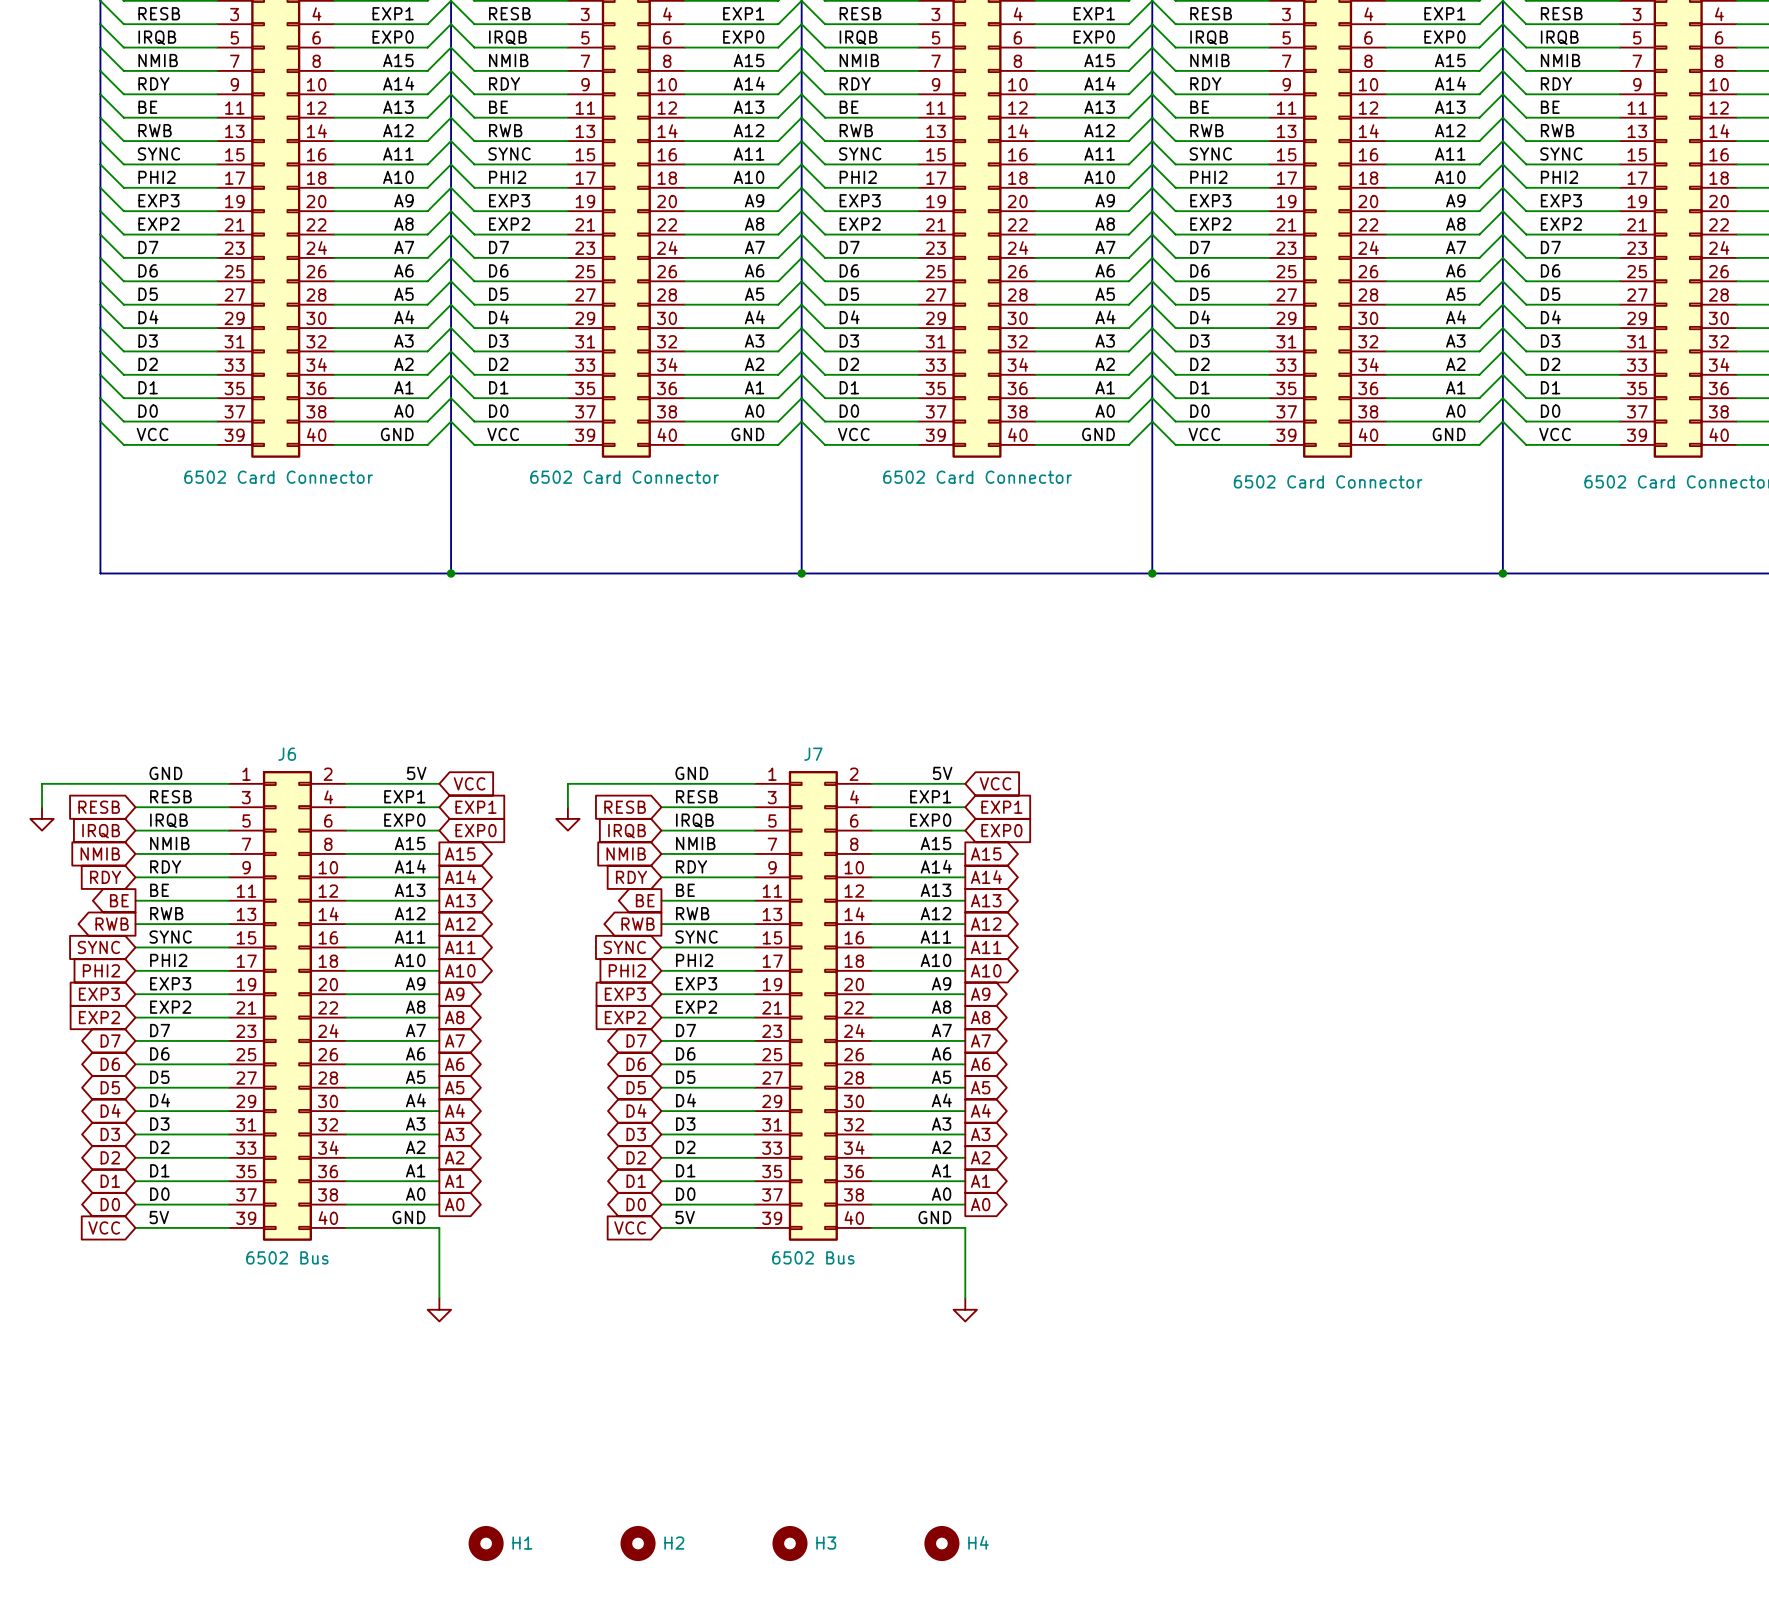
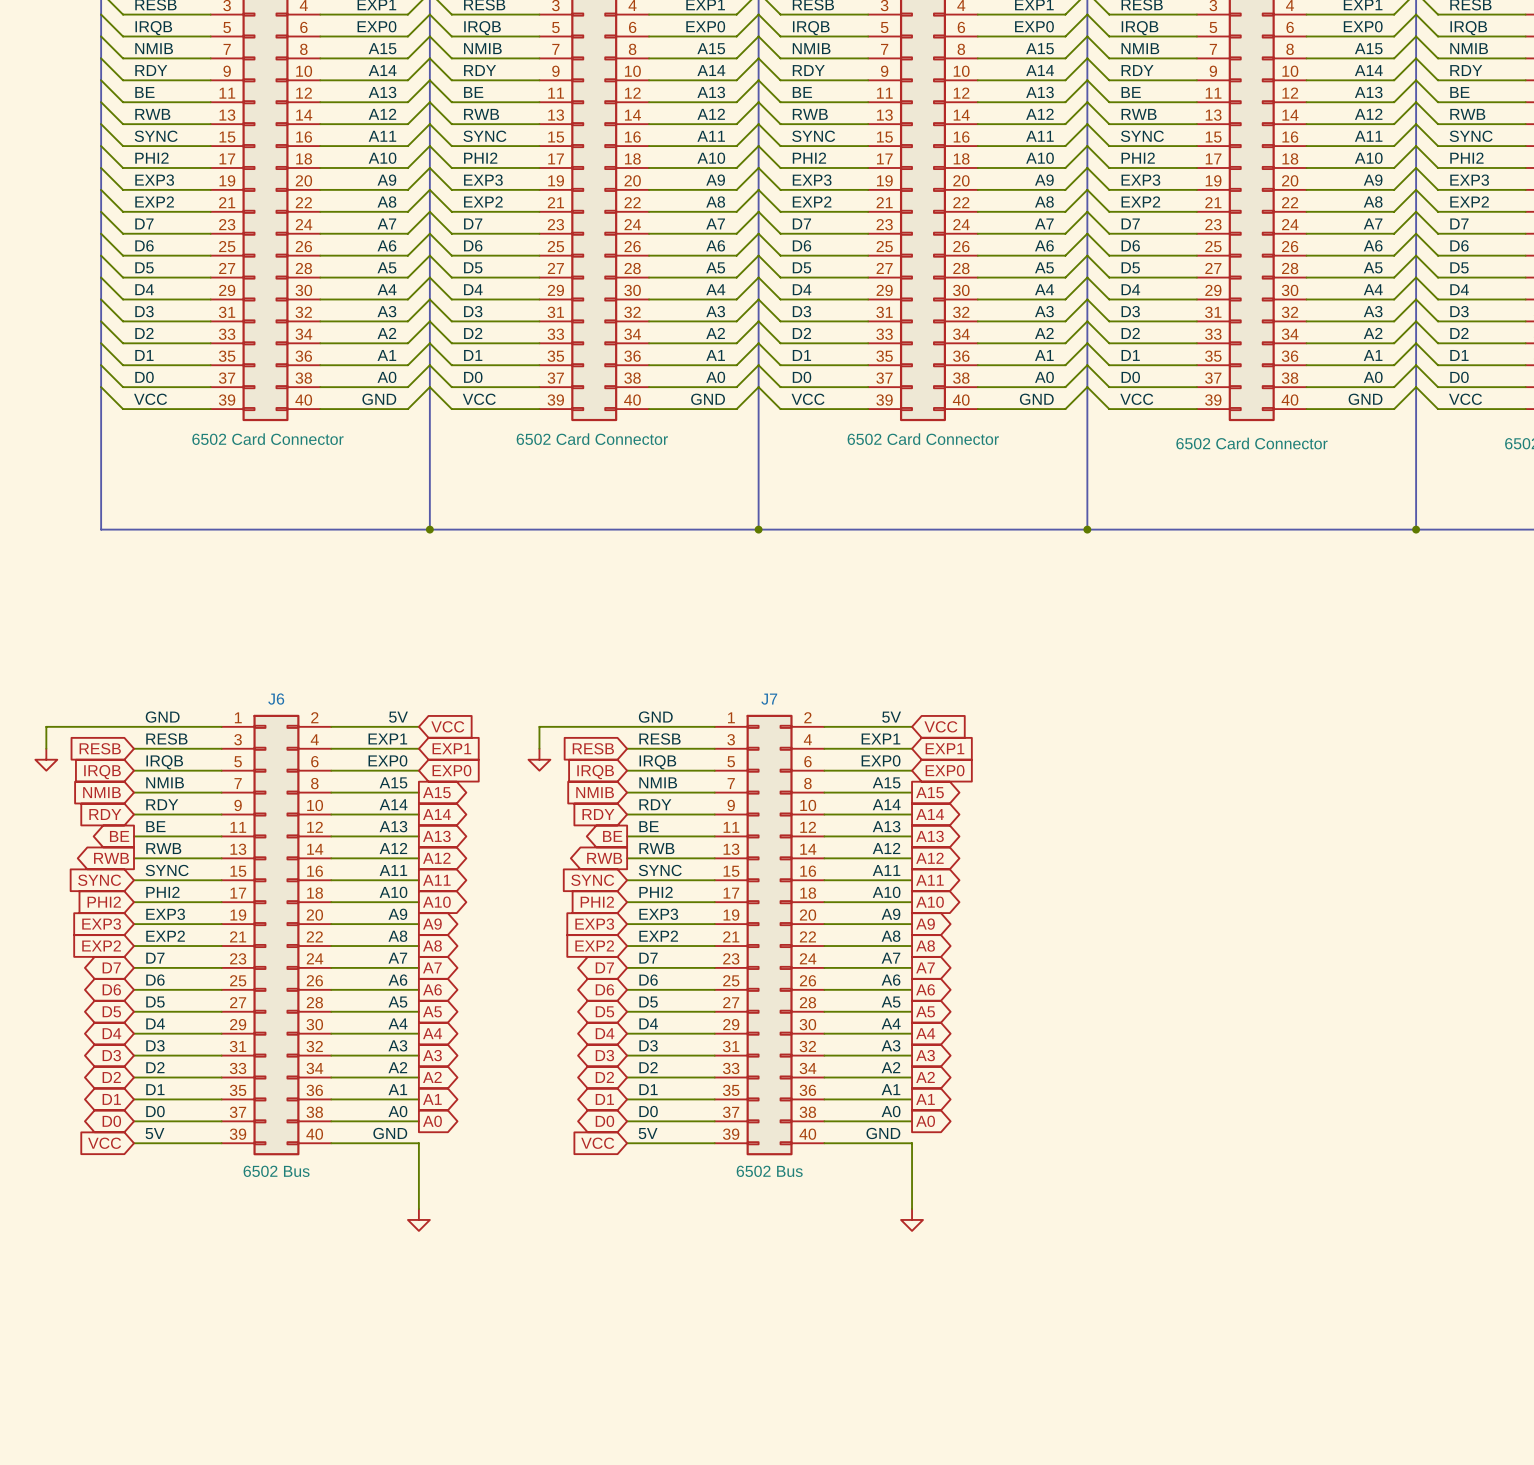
H1: (486, 1543) -> none
H2: (638, 1543) -> none
H3: (789, 1543) -> none
H4: (941, 1543) -> none

